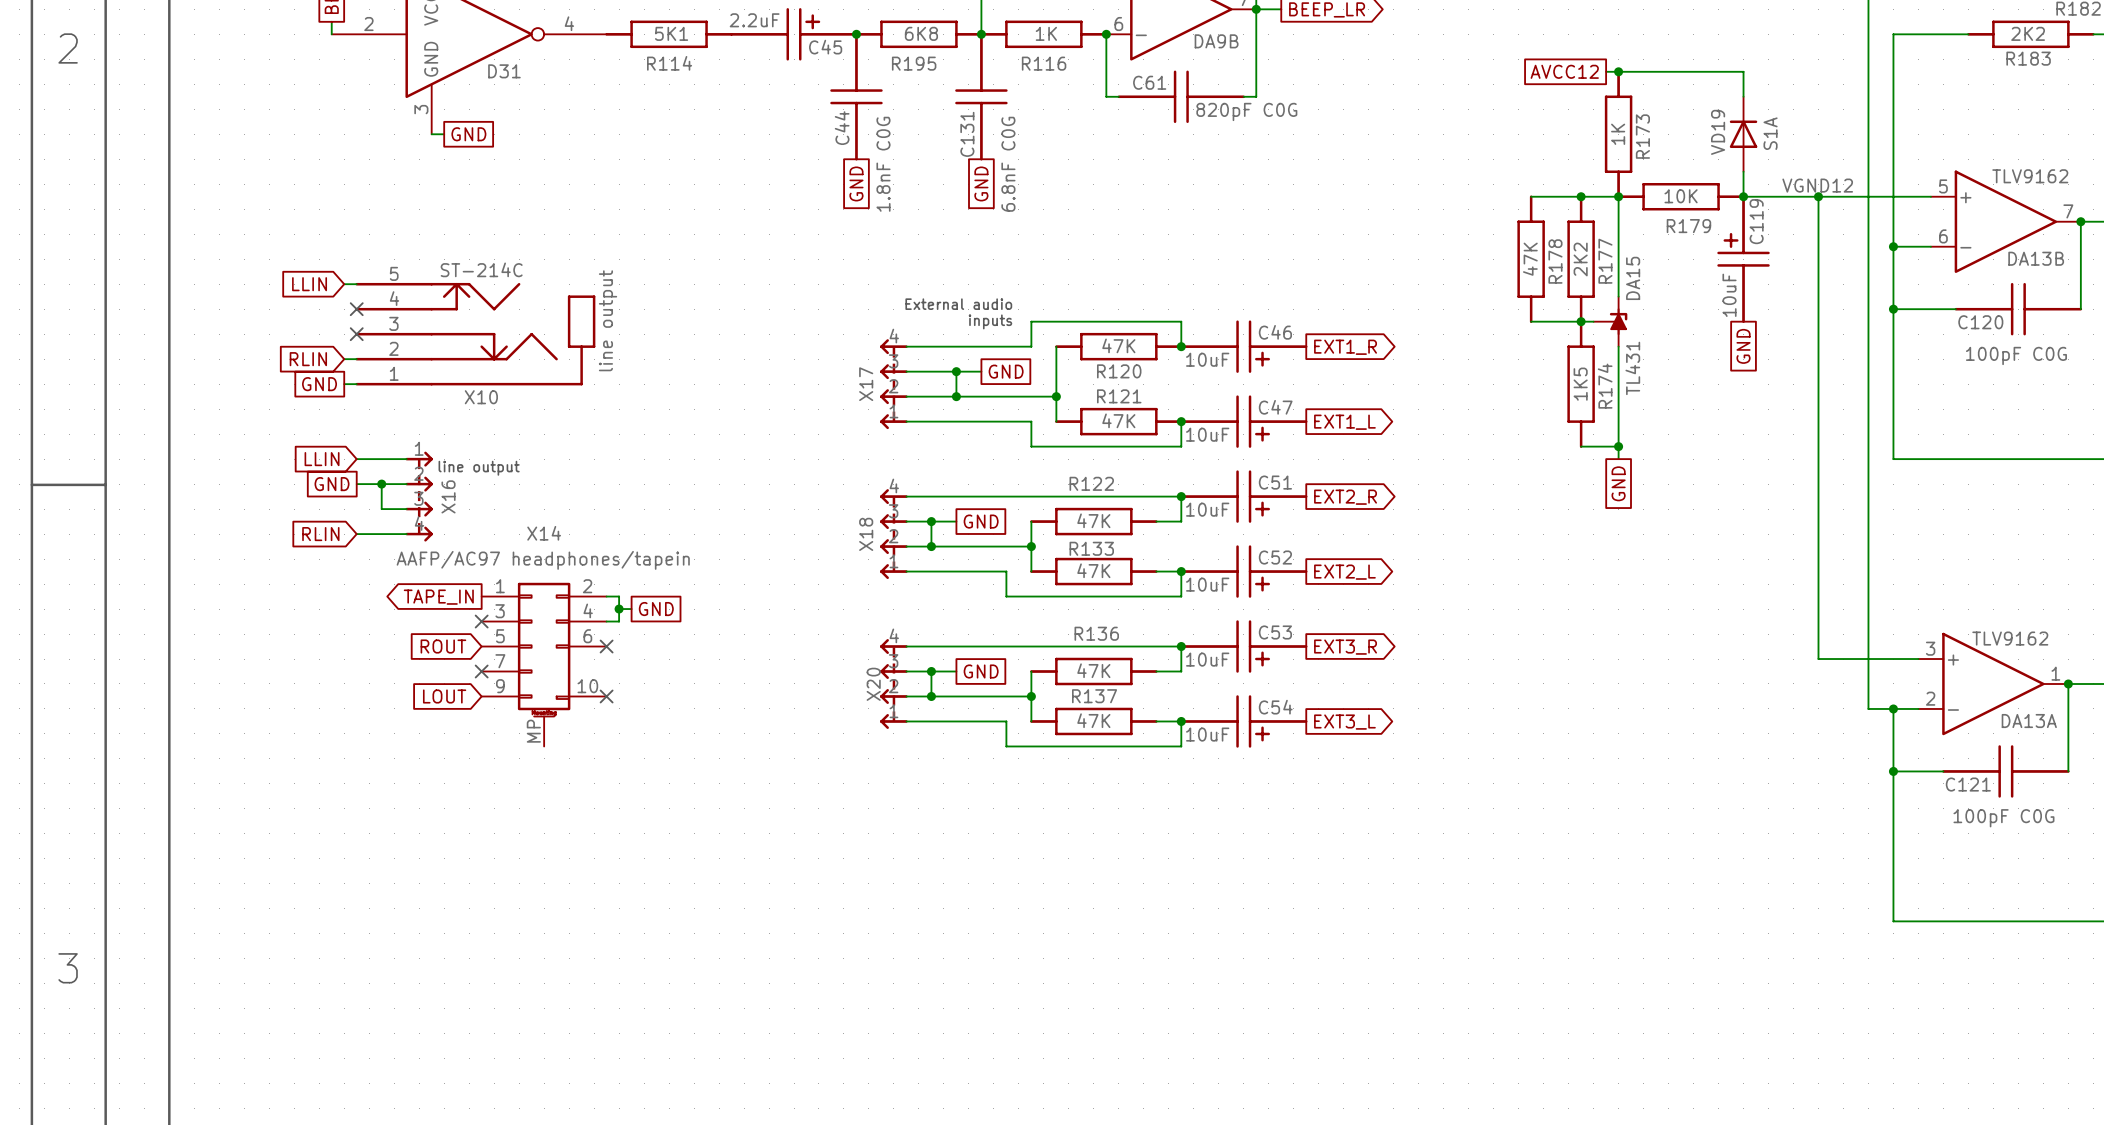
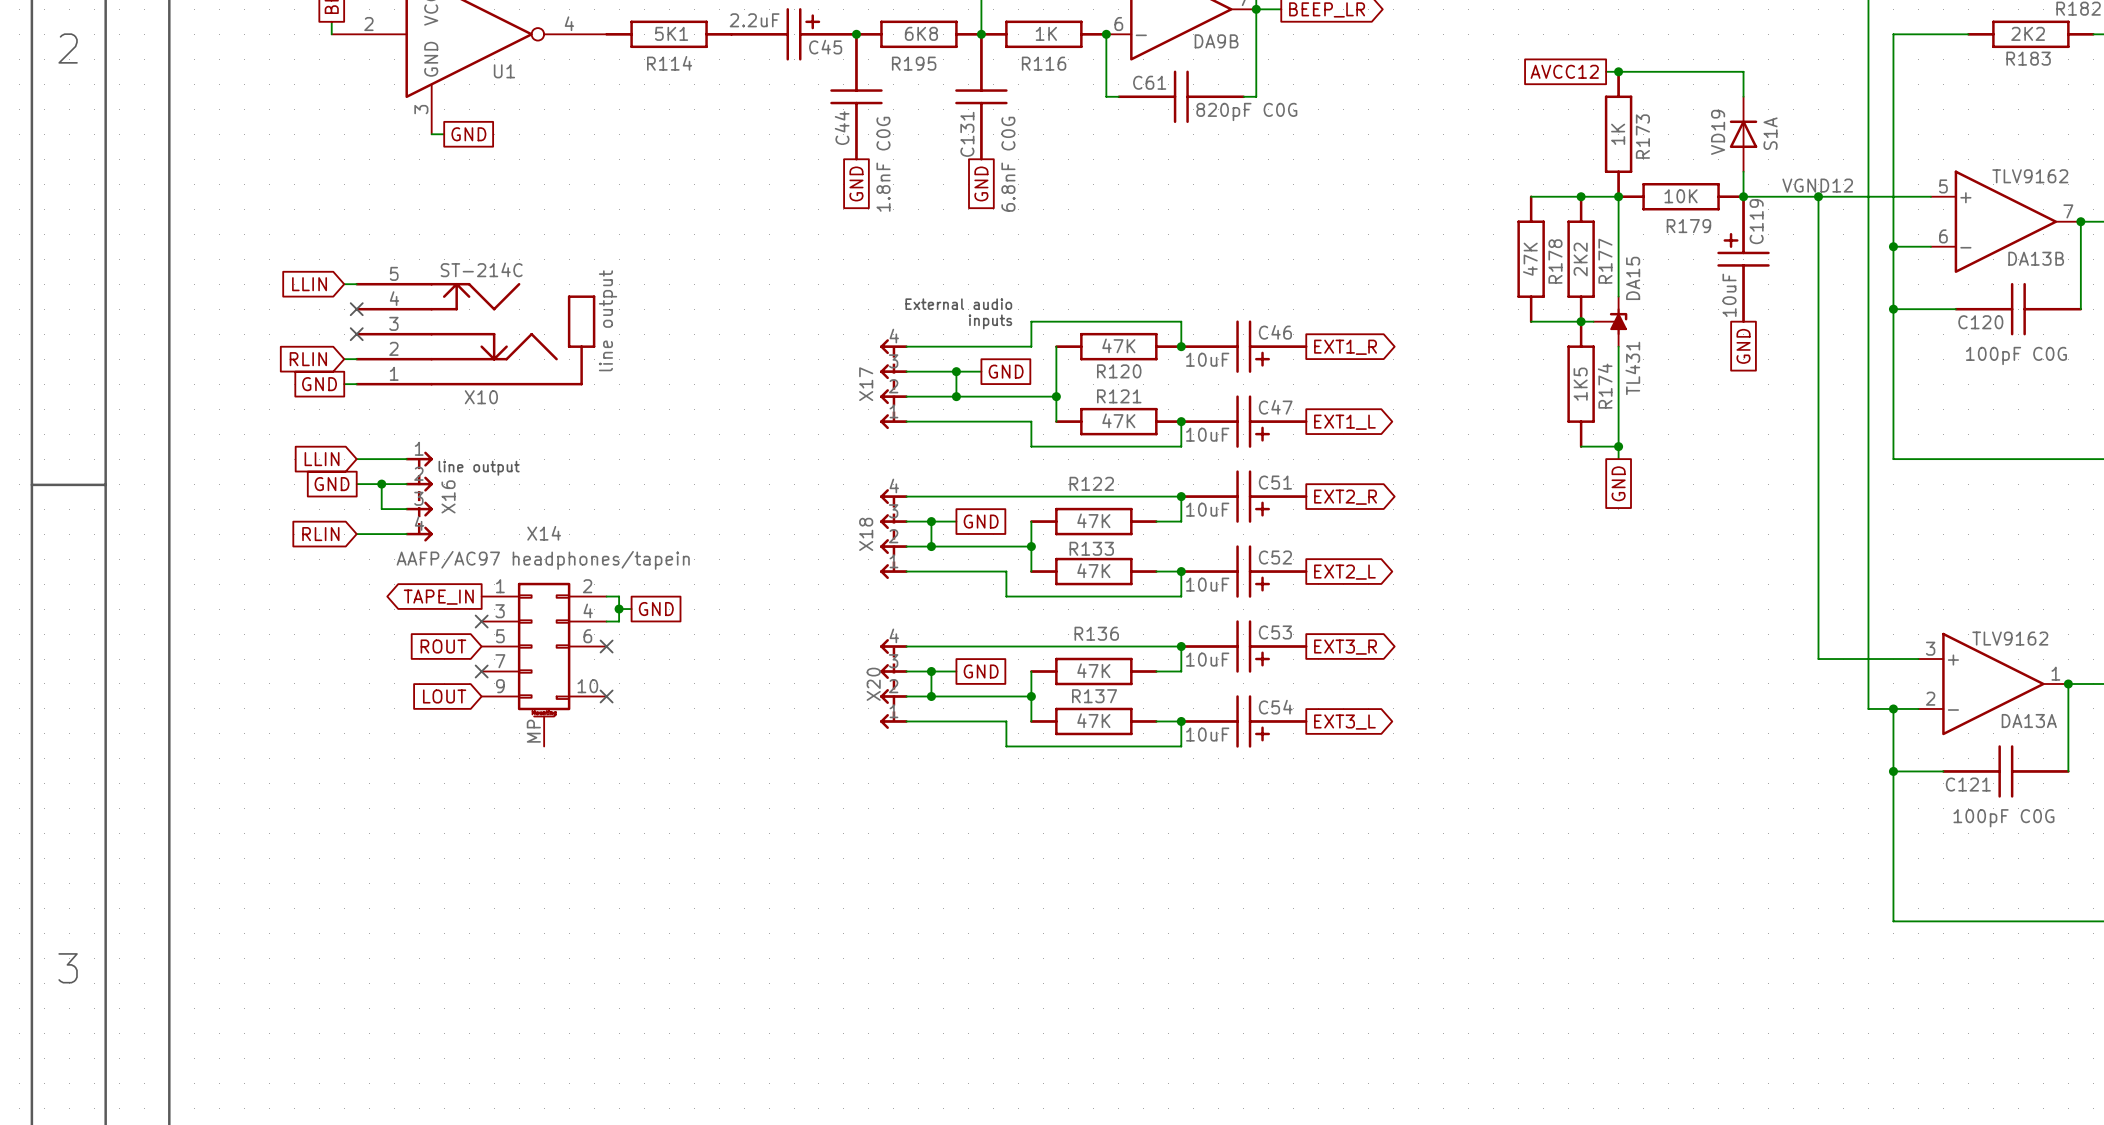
D31 name: D31 (504, 71) -> U1 (504, 71)

